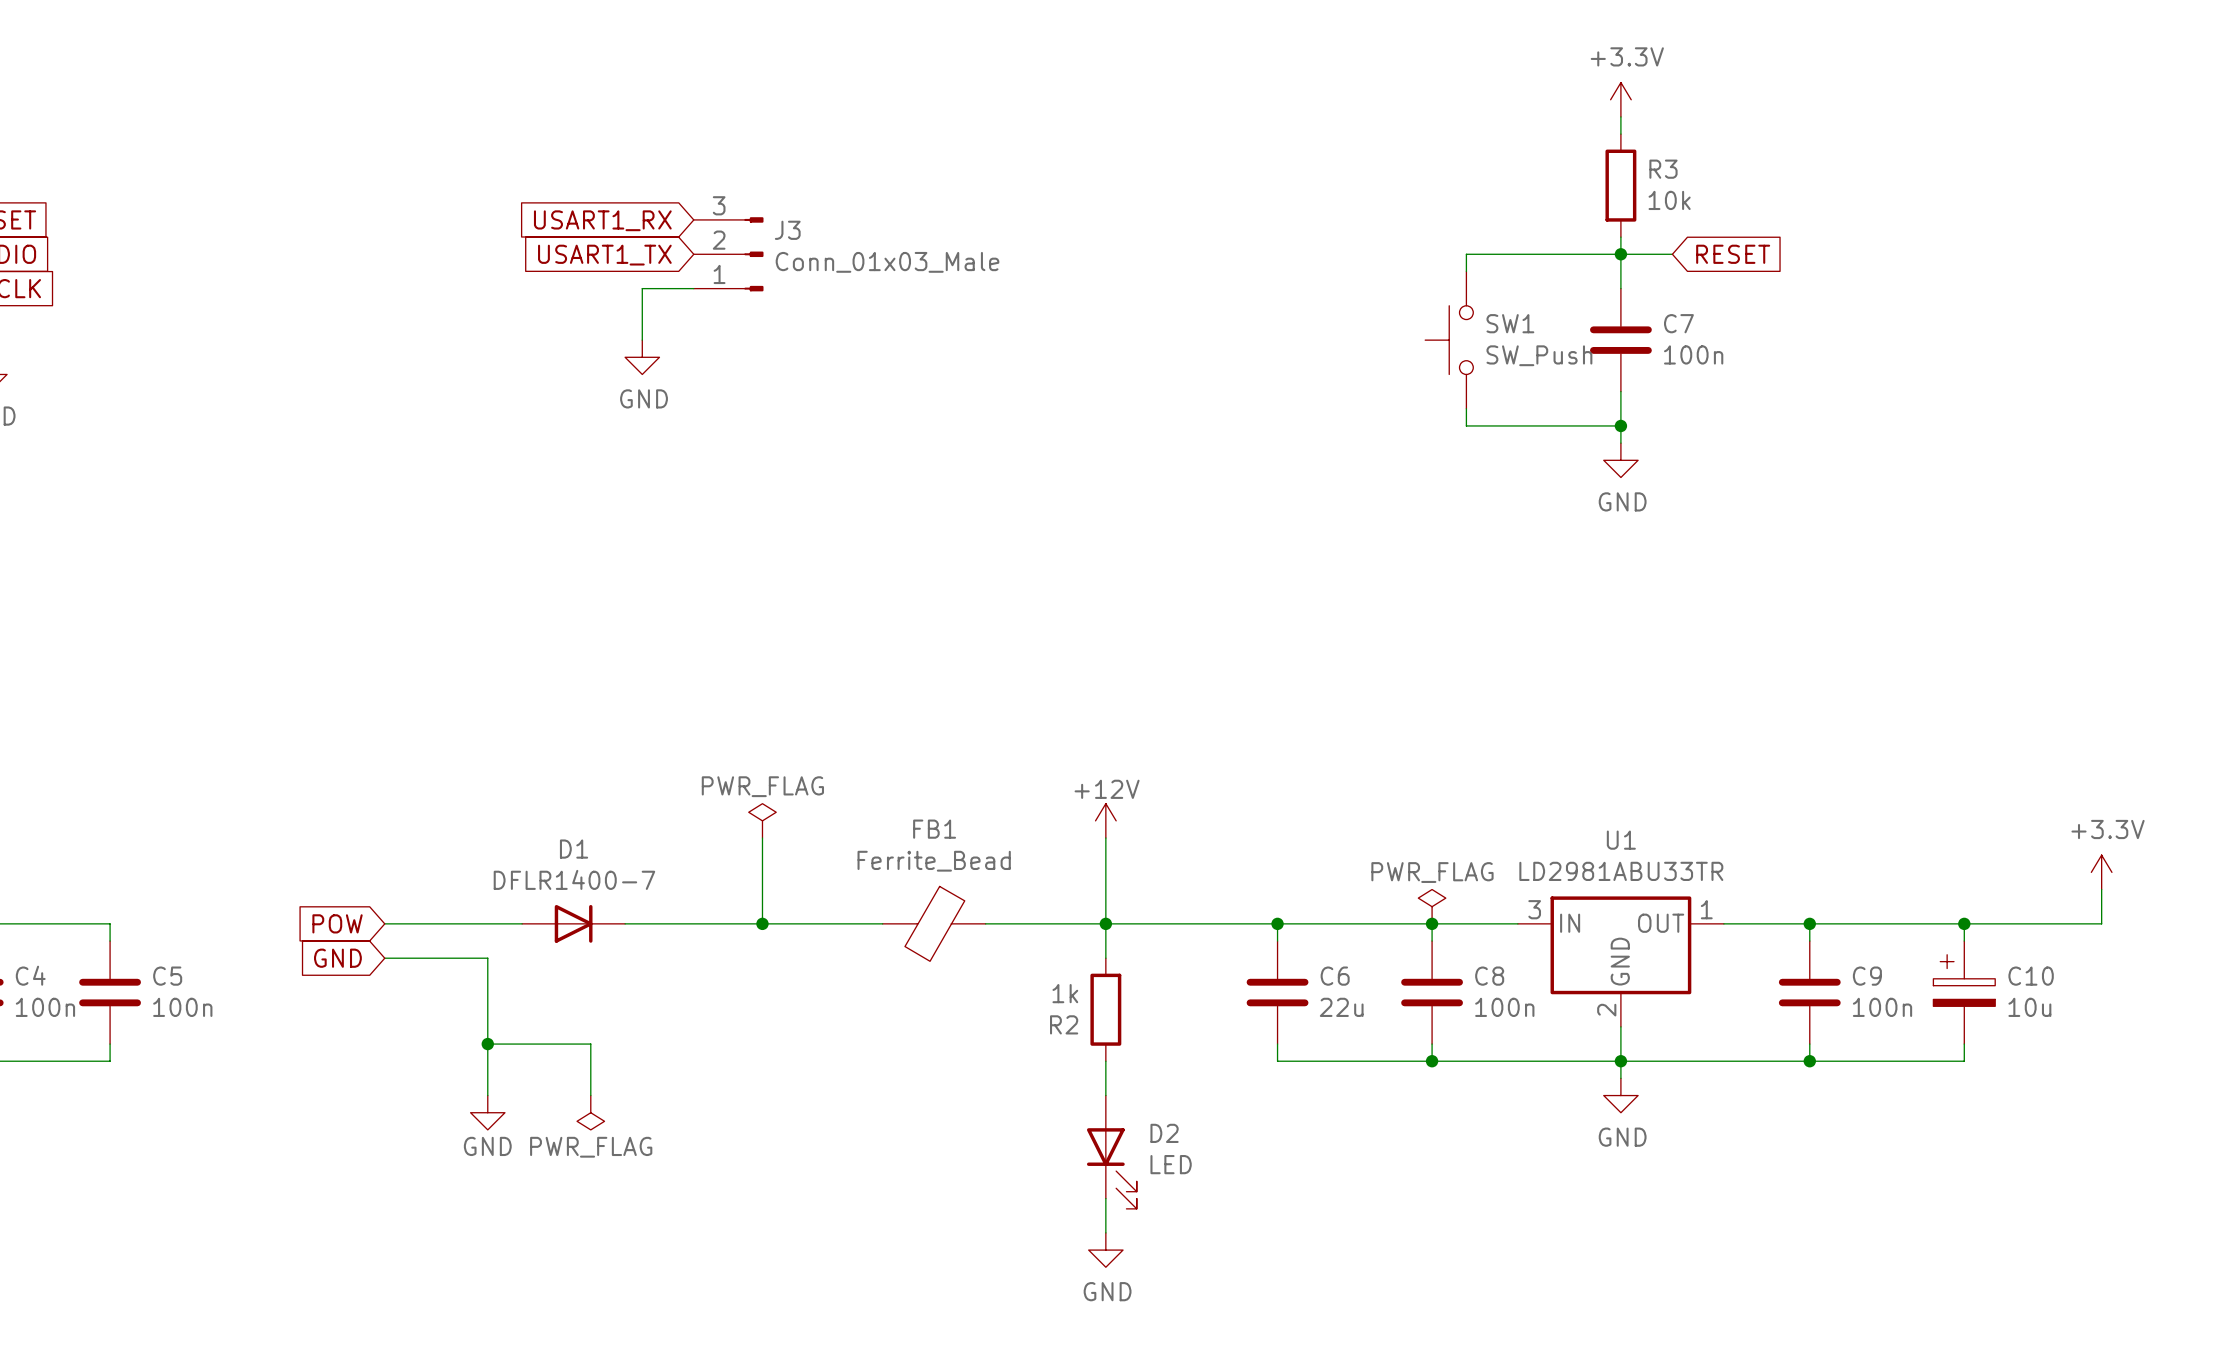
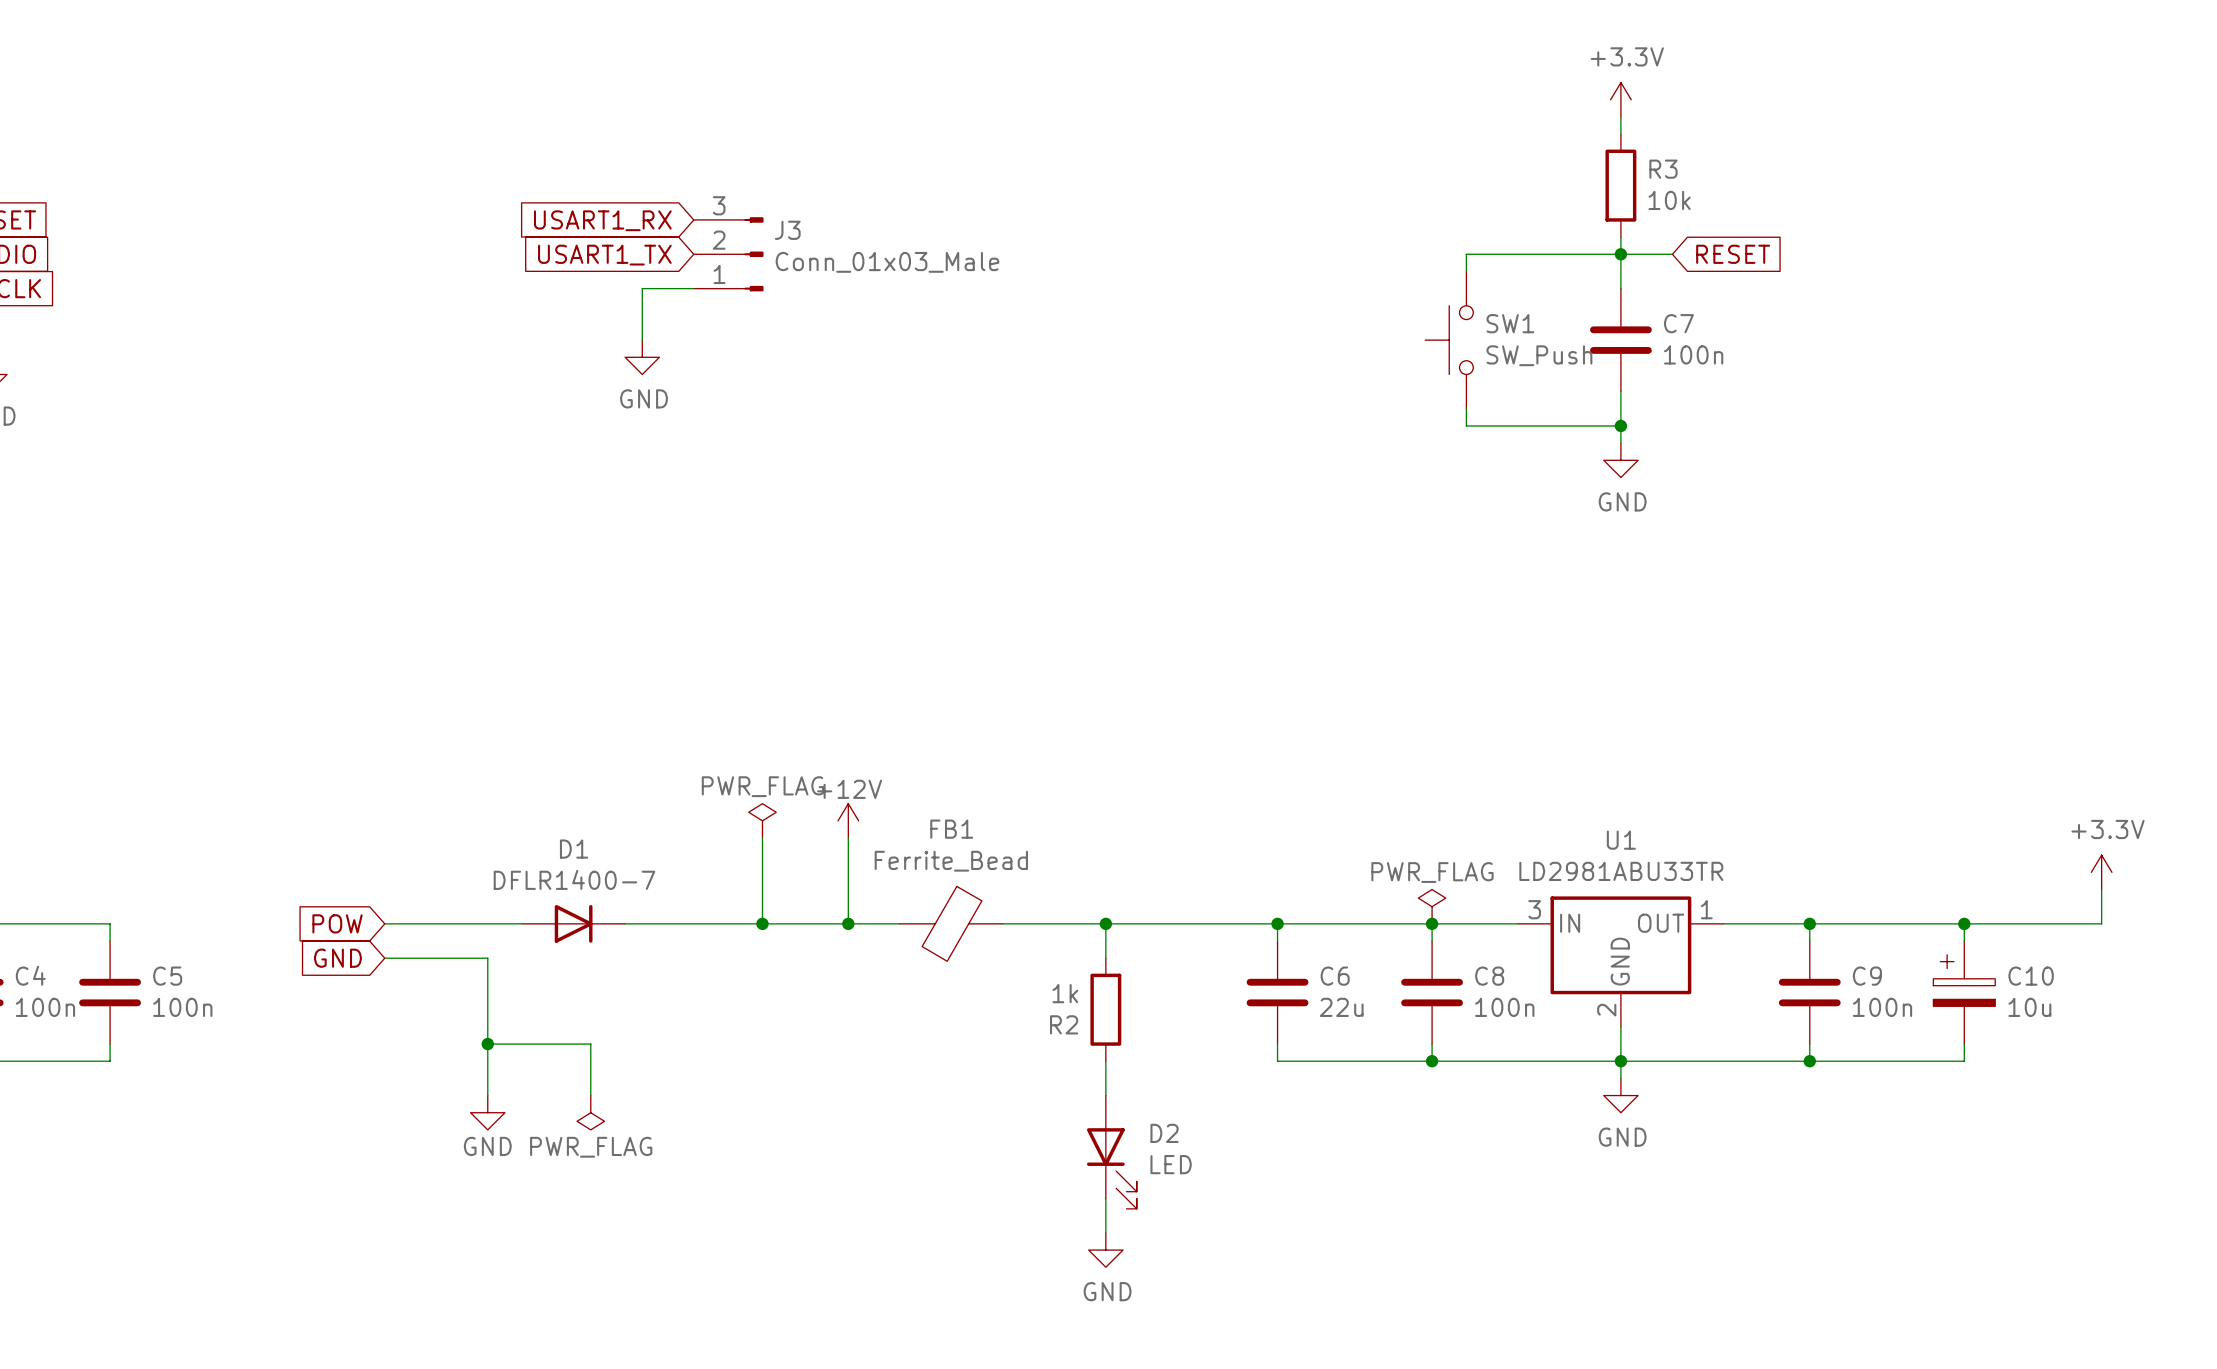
power symbol position: +12V (1105, 820) -> +12V (848, 820)
wire: (1105, 838) (1105, 923) -> (848, 838) (848, 923)
junction: none -> (848, 923)
FB1 position: (934, 923) -> (951, 923)

